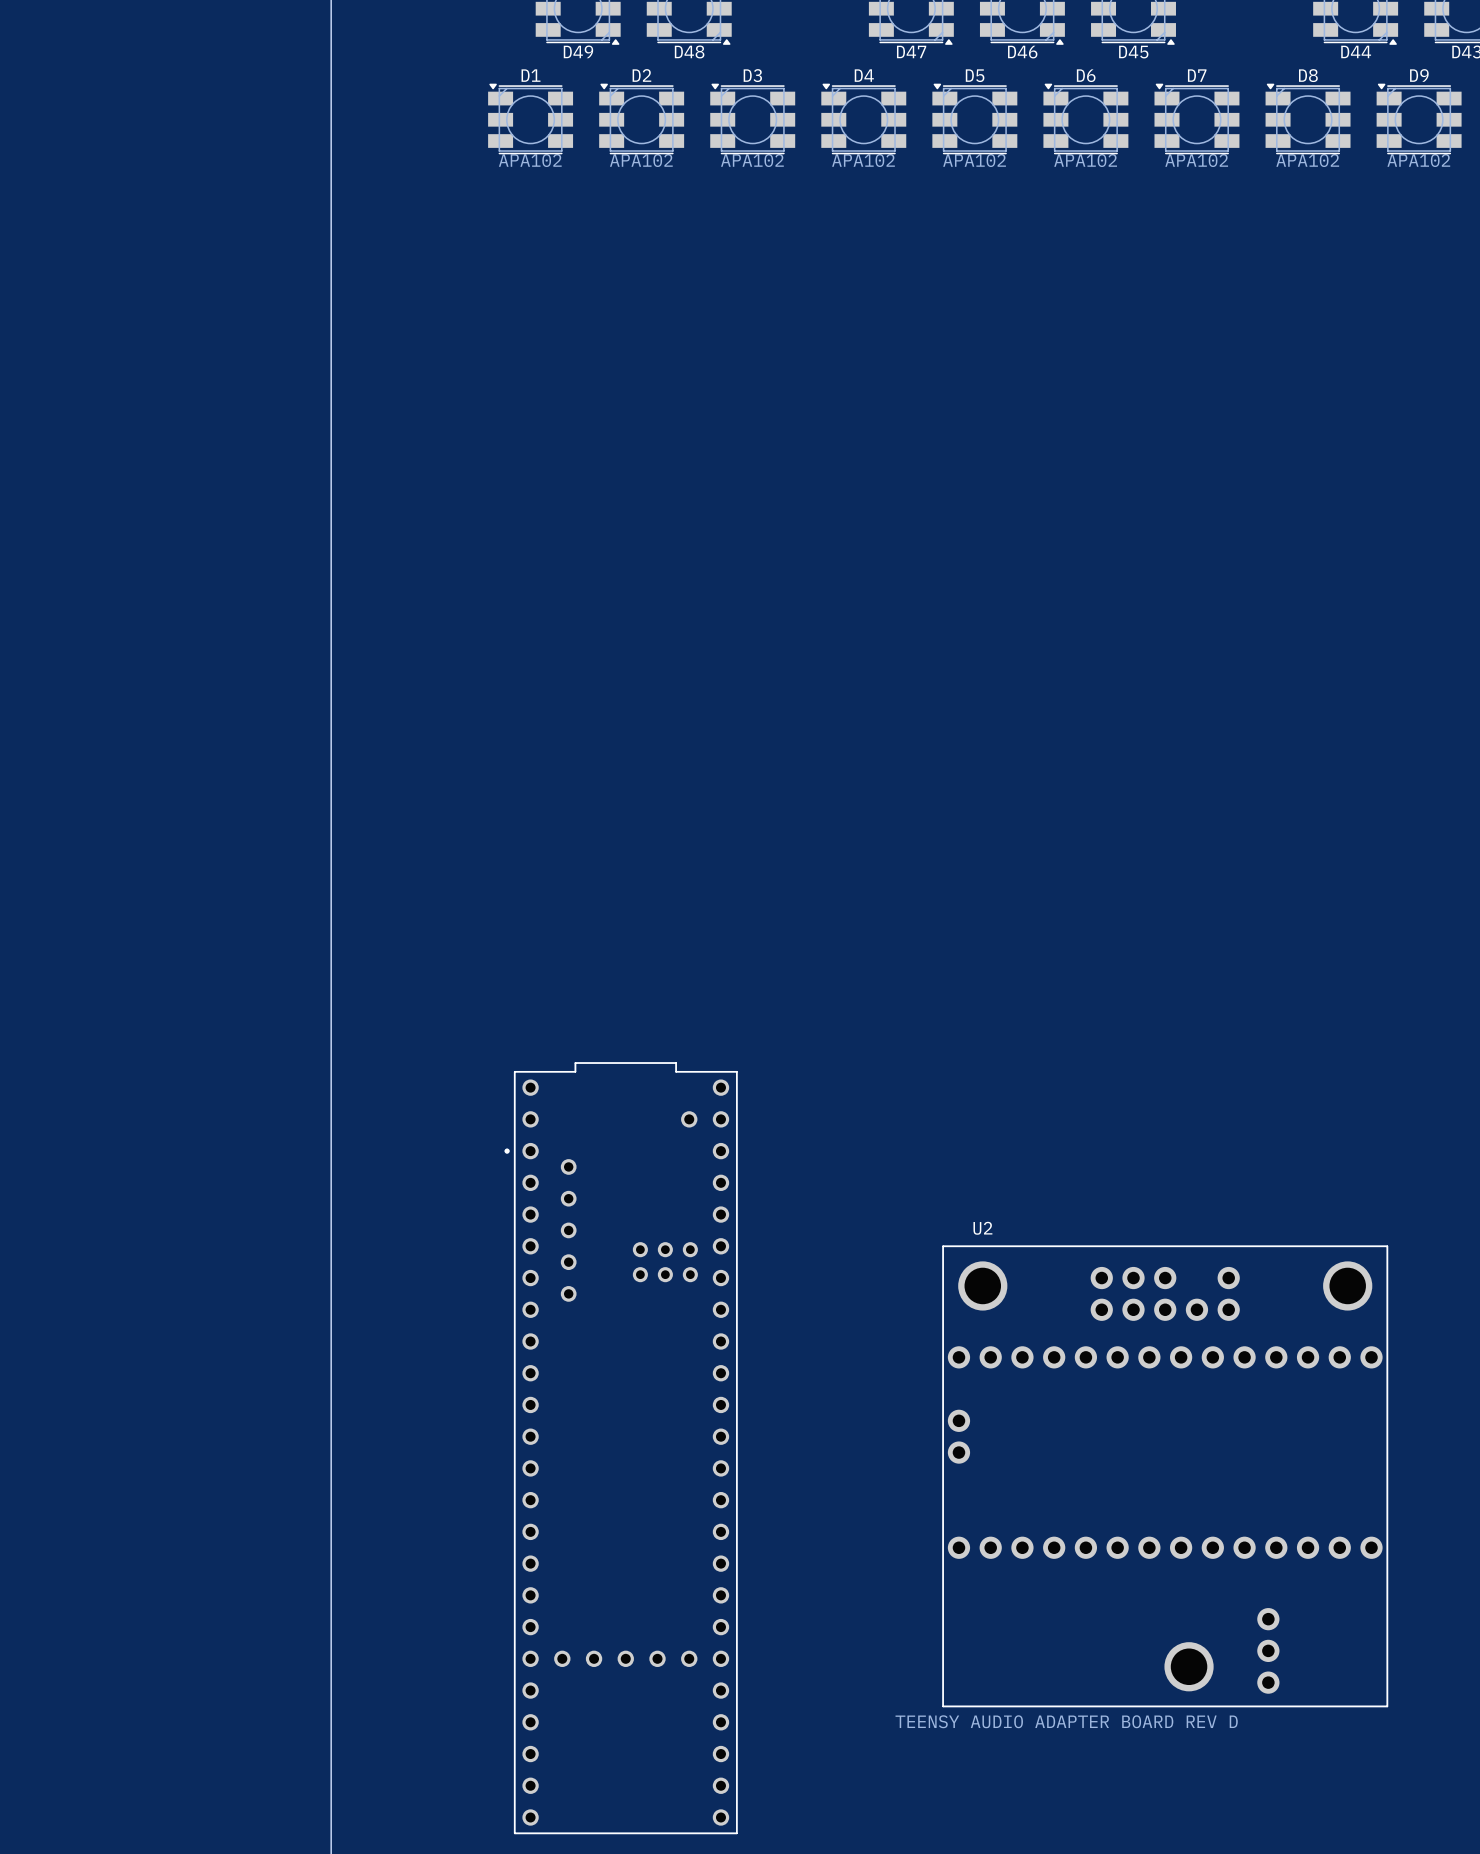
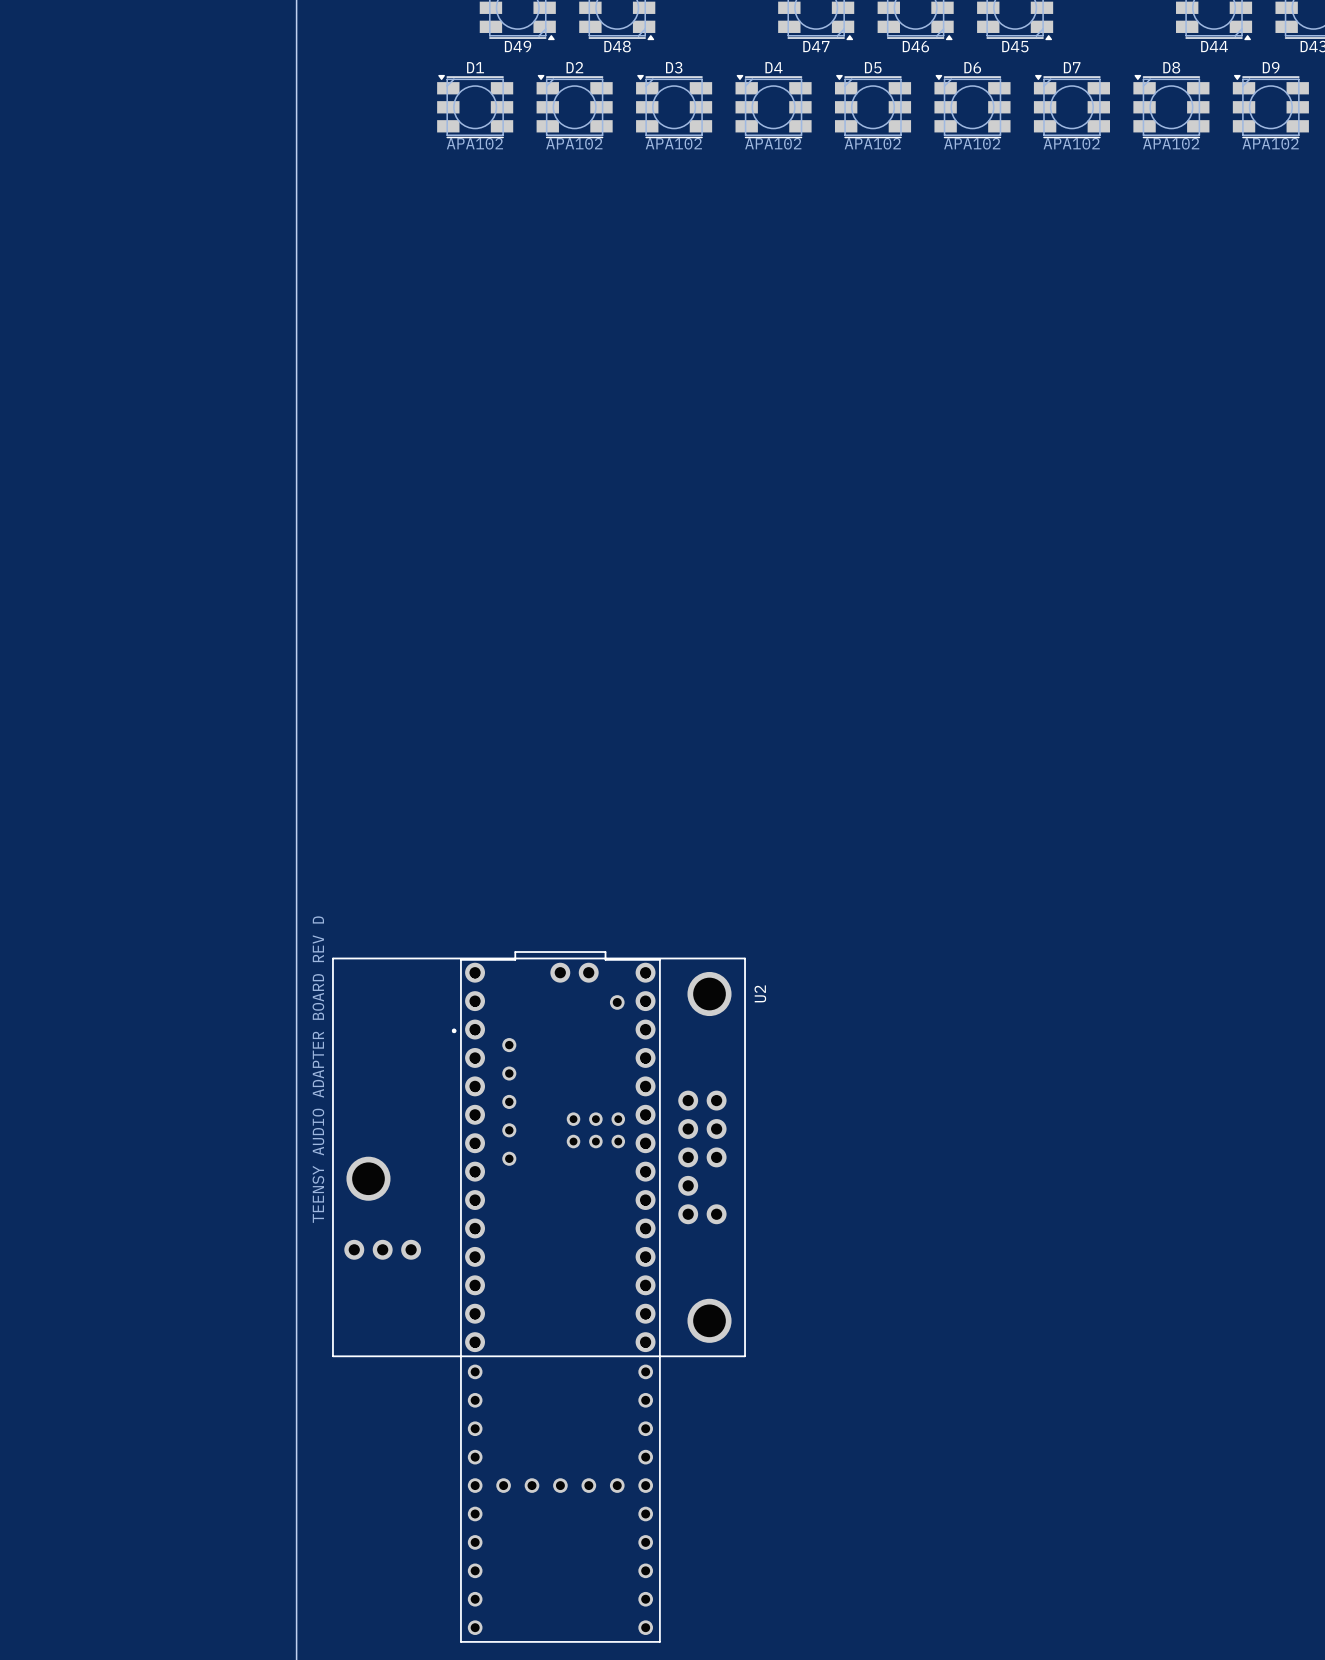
U2 rotation: 0° (1165, 1476) -> 90° clockwise (538, 1157)
U2 position: (1165, 1476) -> (538, 1157)

